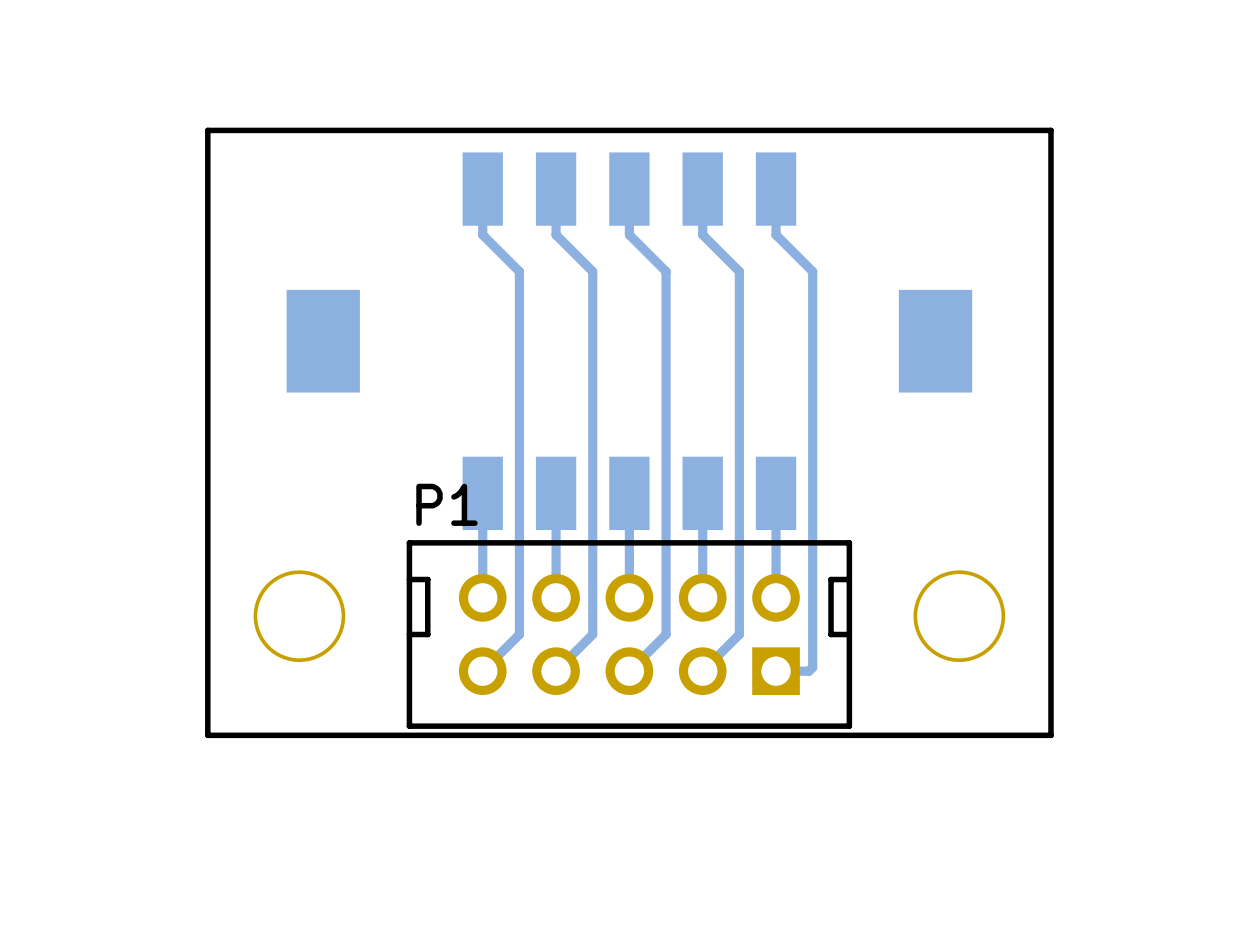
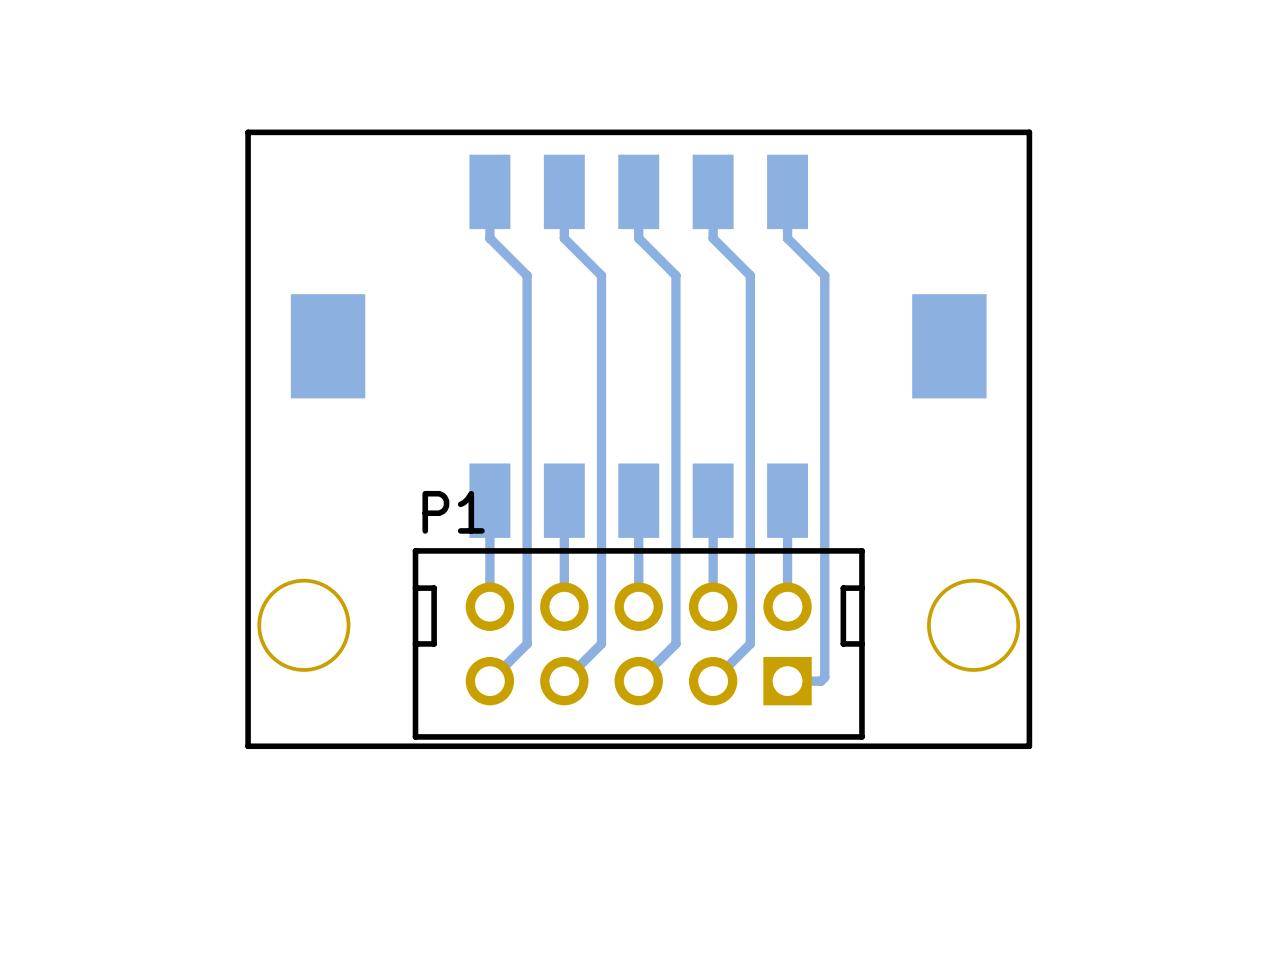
board edge: (244, 130) (207, 130) (207, 735) (244, 735) -> (248, 132) (248, 746)
board edge: (1014, 130) (1050, 130) (1050, 735) (1014, 735) -> (1029, 132) (1029, 746)

